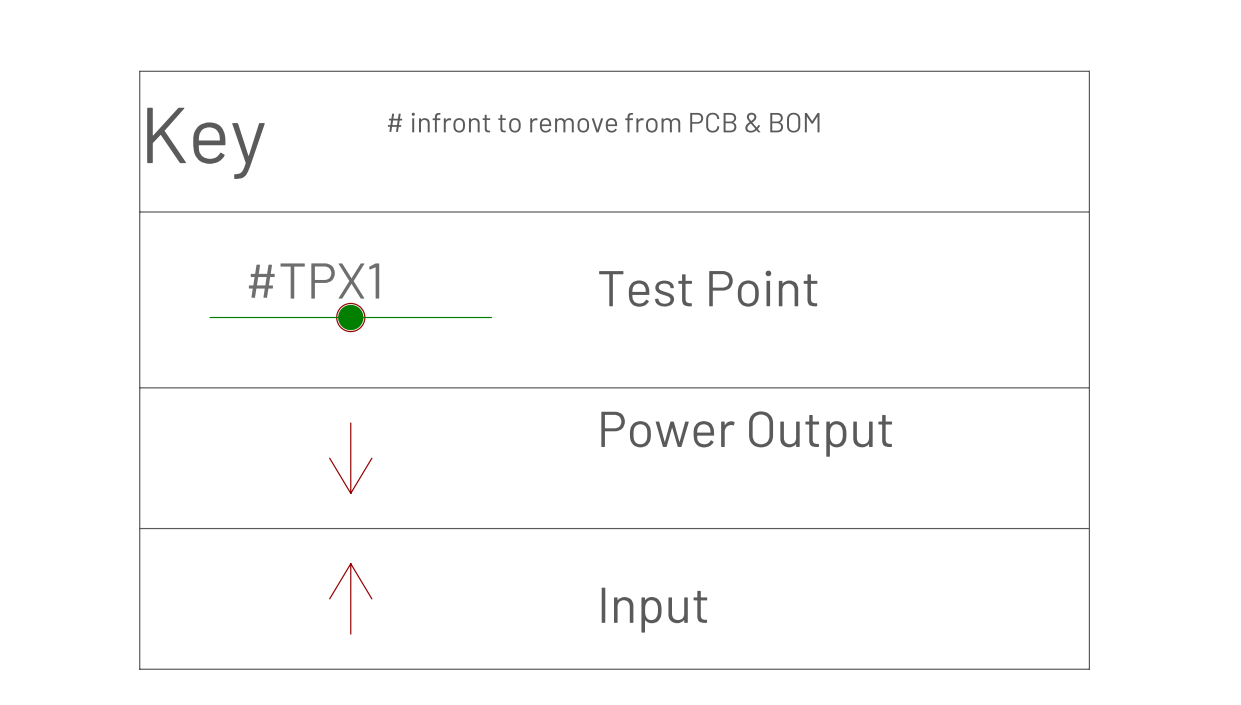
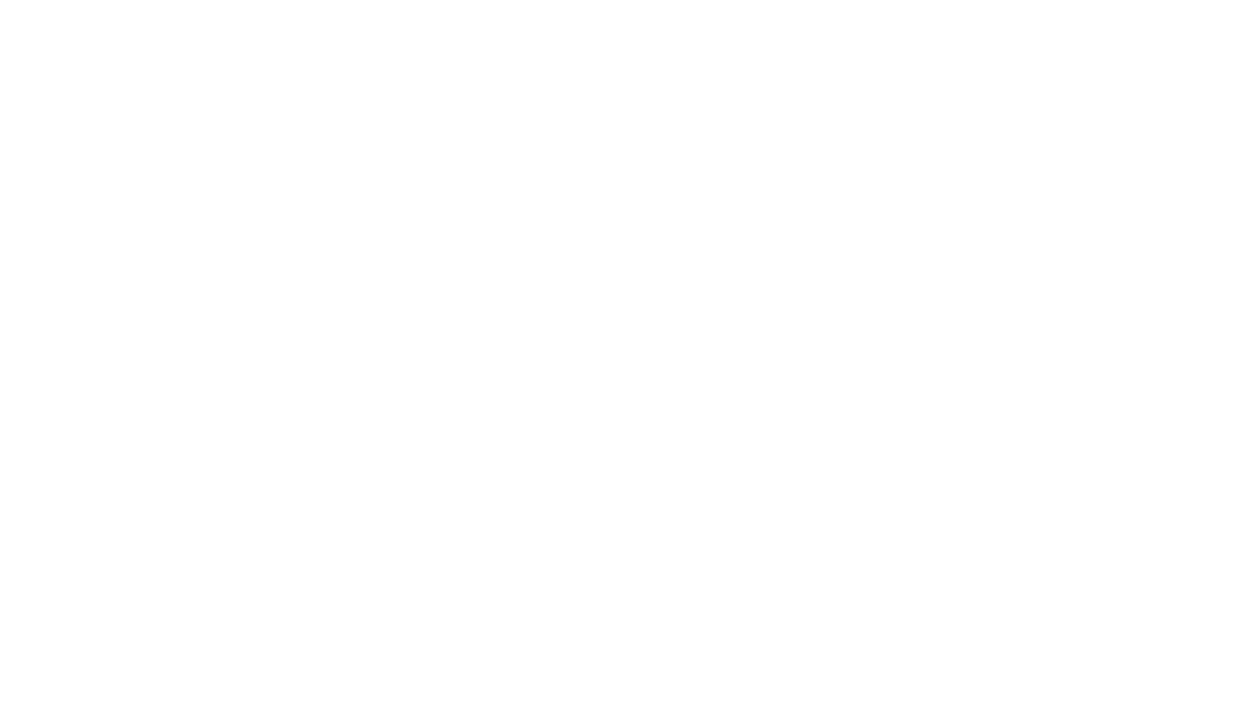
line: (139, 71) (139, 669) (1089, 669) (1089, 71) (139, 71) -> none
text: # infront to remove from PCB & BOM (603, 122) -> none
text: Key (206, 143) -> none
line: (139, 211) (1089, 211) -> none
text: Test Point (708, 288) -> none
wire: (210, 317) (491, 317) -> none
junction: (350, 317) -> none
#TPX1: (350, 317) -> none
line: (139, 387) (1089, 387) -> none
text: Power Output (746, 434) -> none
power symbol: (350, 458) -> none
line: (139, 528) (1089, 528) -> none
power symbol: (350, 598) -> none
text: Input (654, 610) -> none

